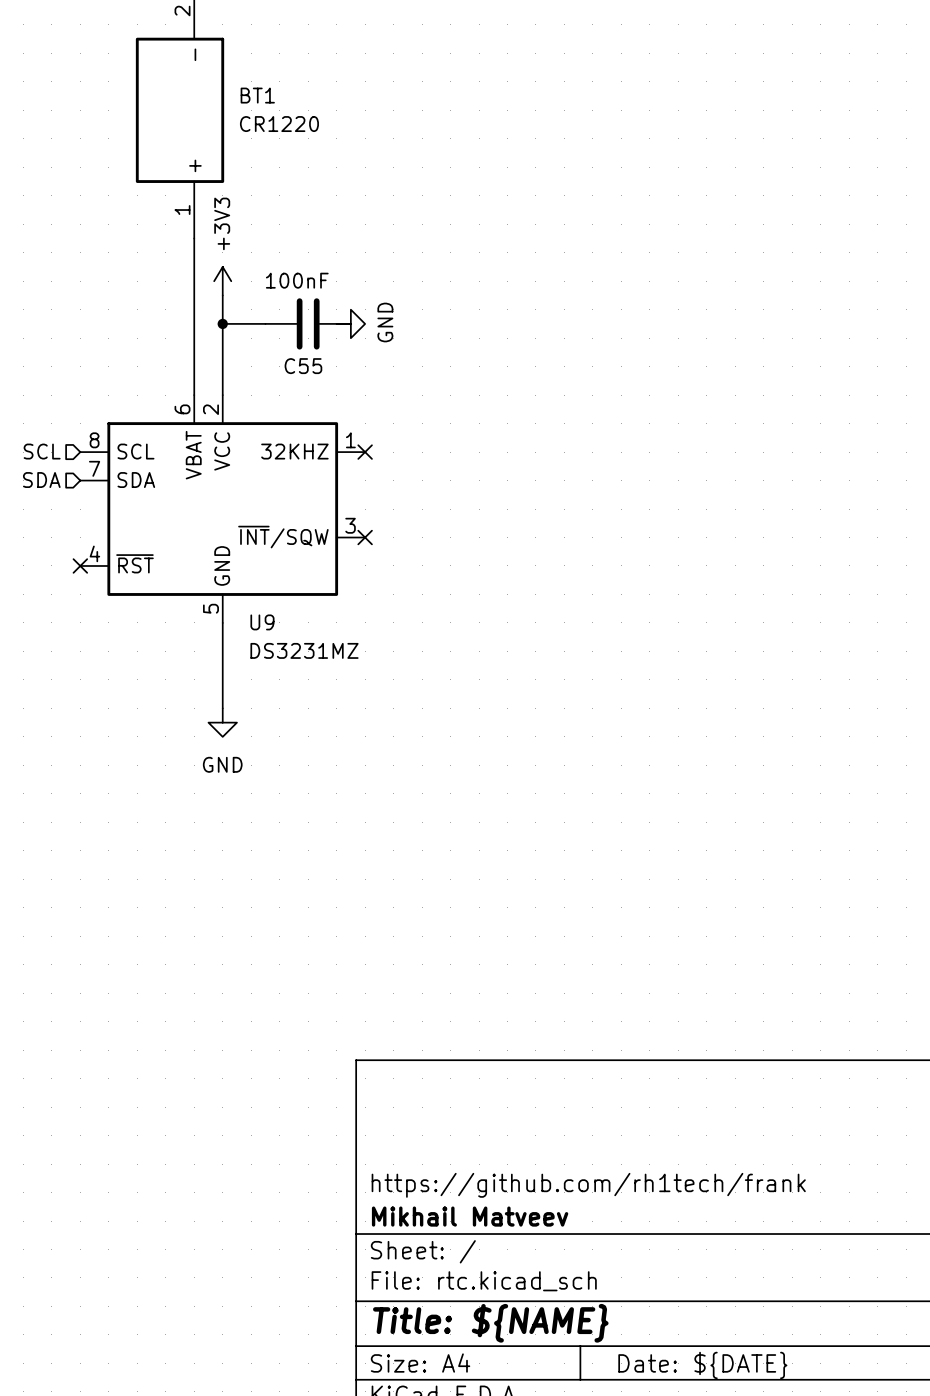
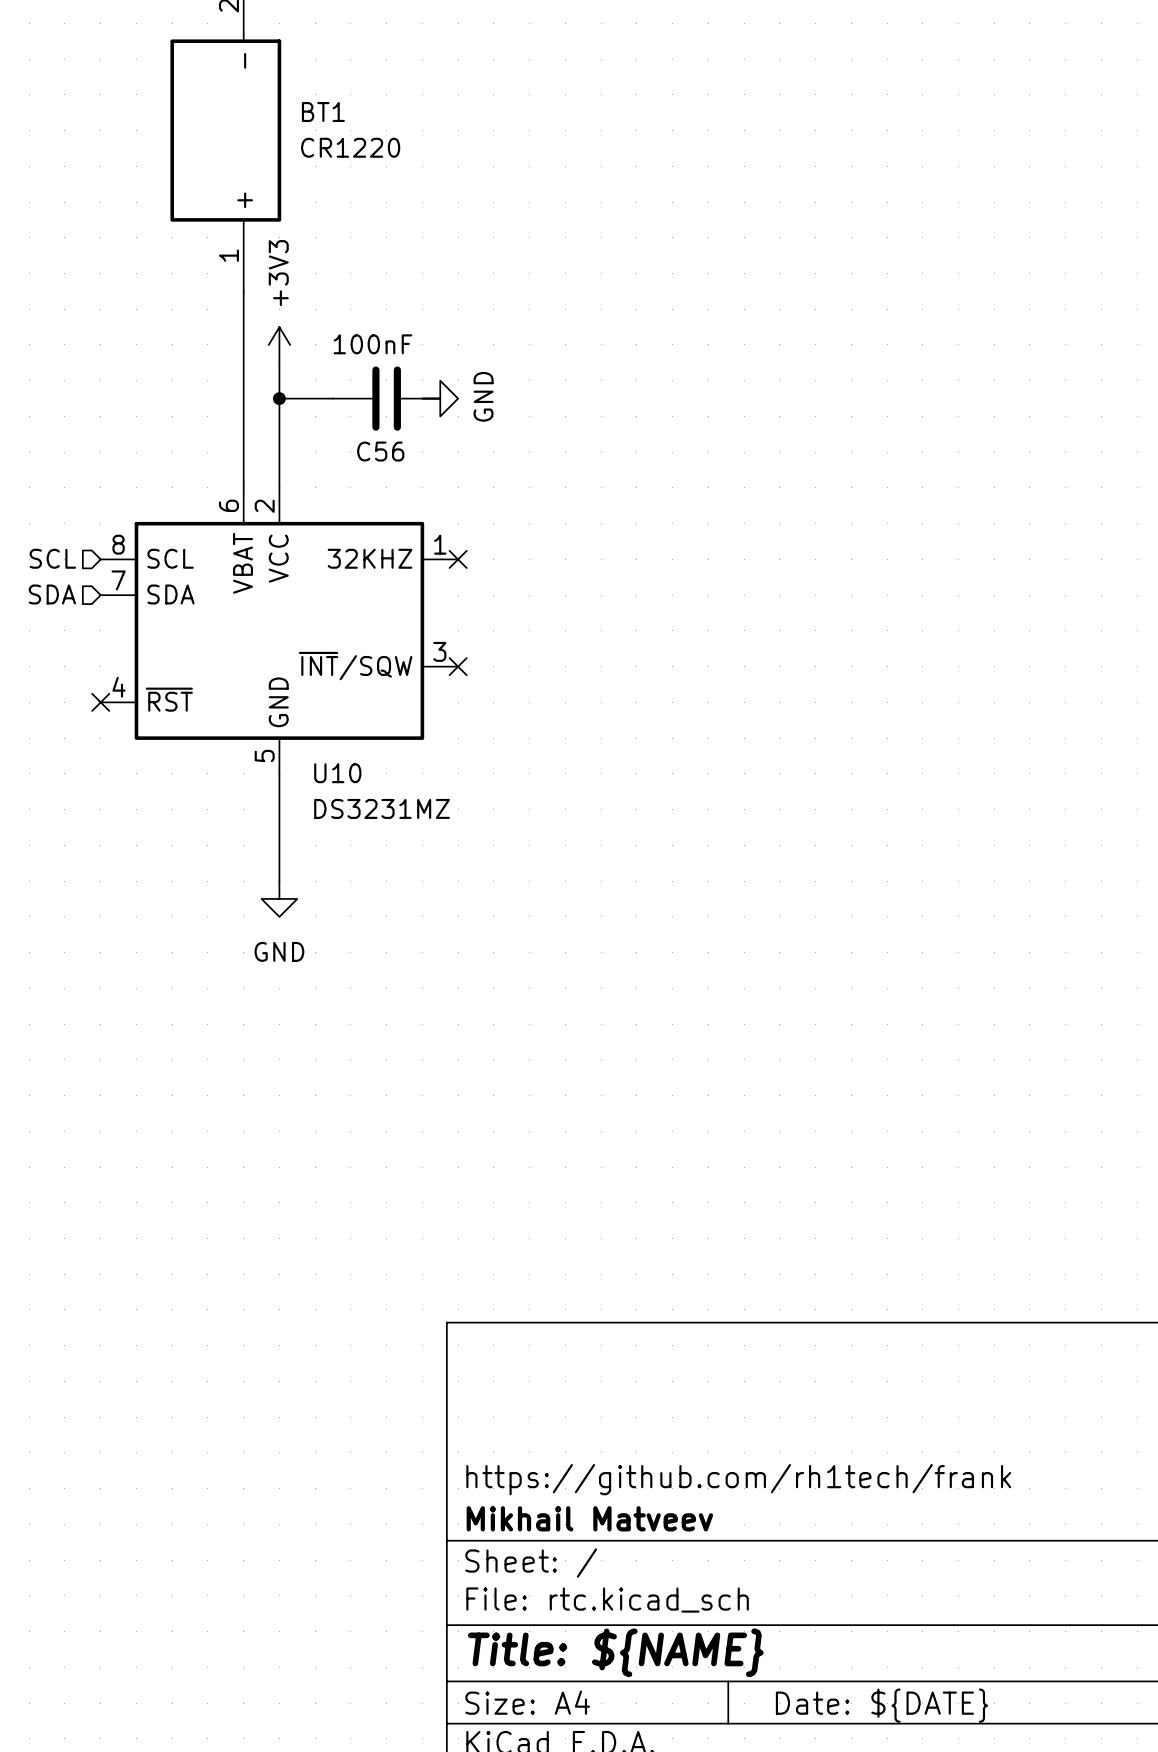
C55 name: C55 (303, 366) -> C56 (380, 451)
U9 name: U9 (262, 622) -> U10 (337, 773)

